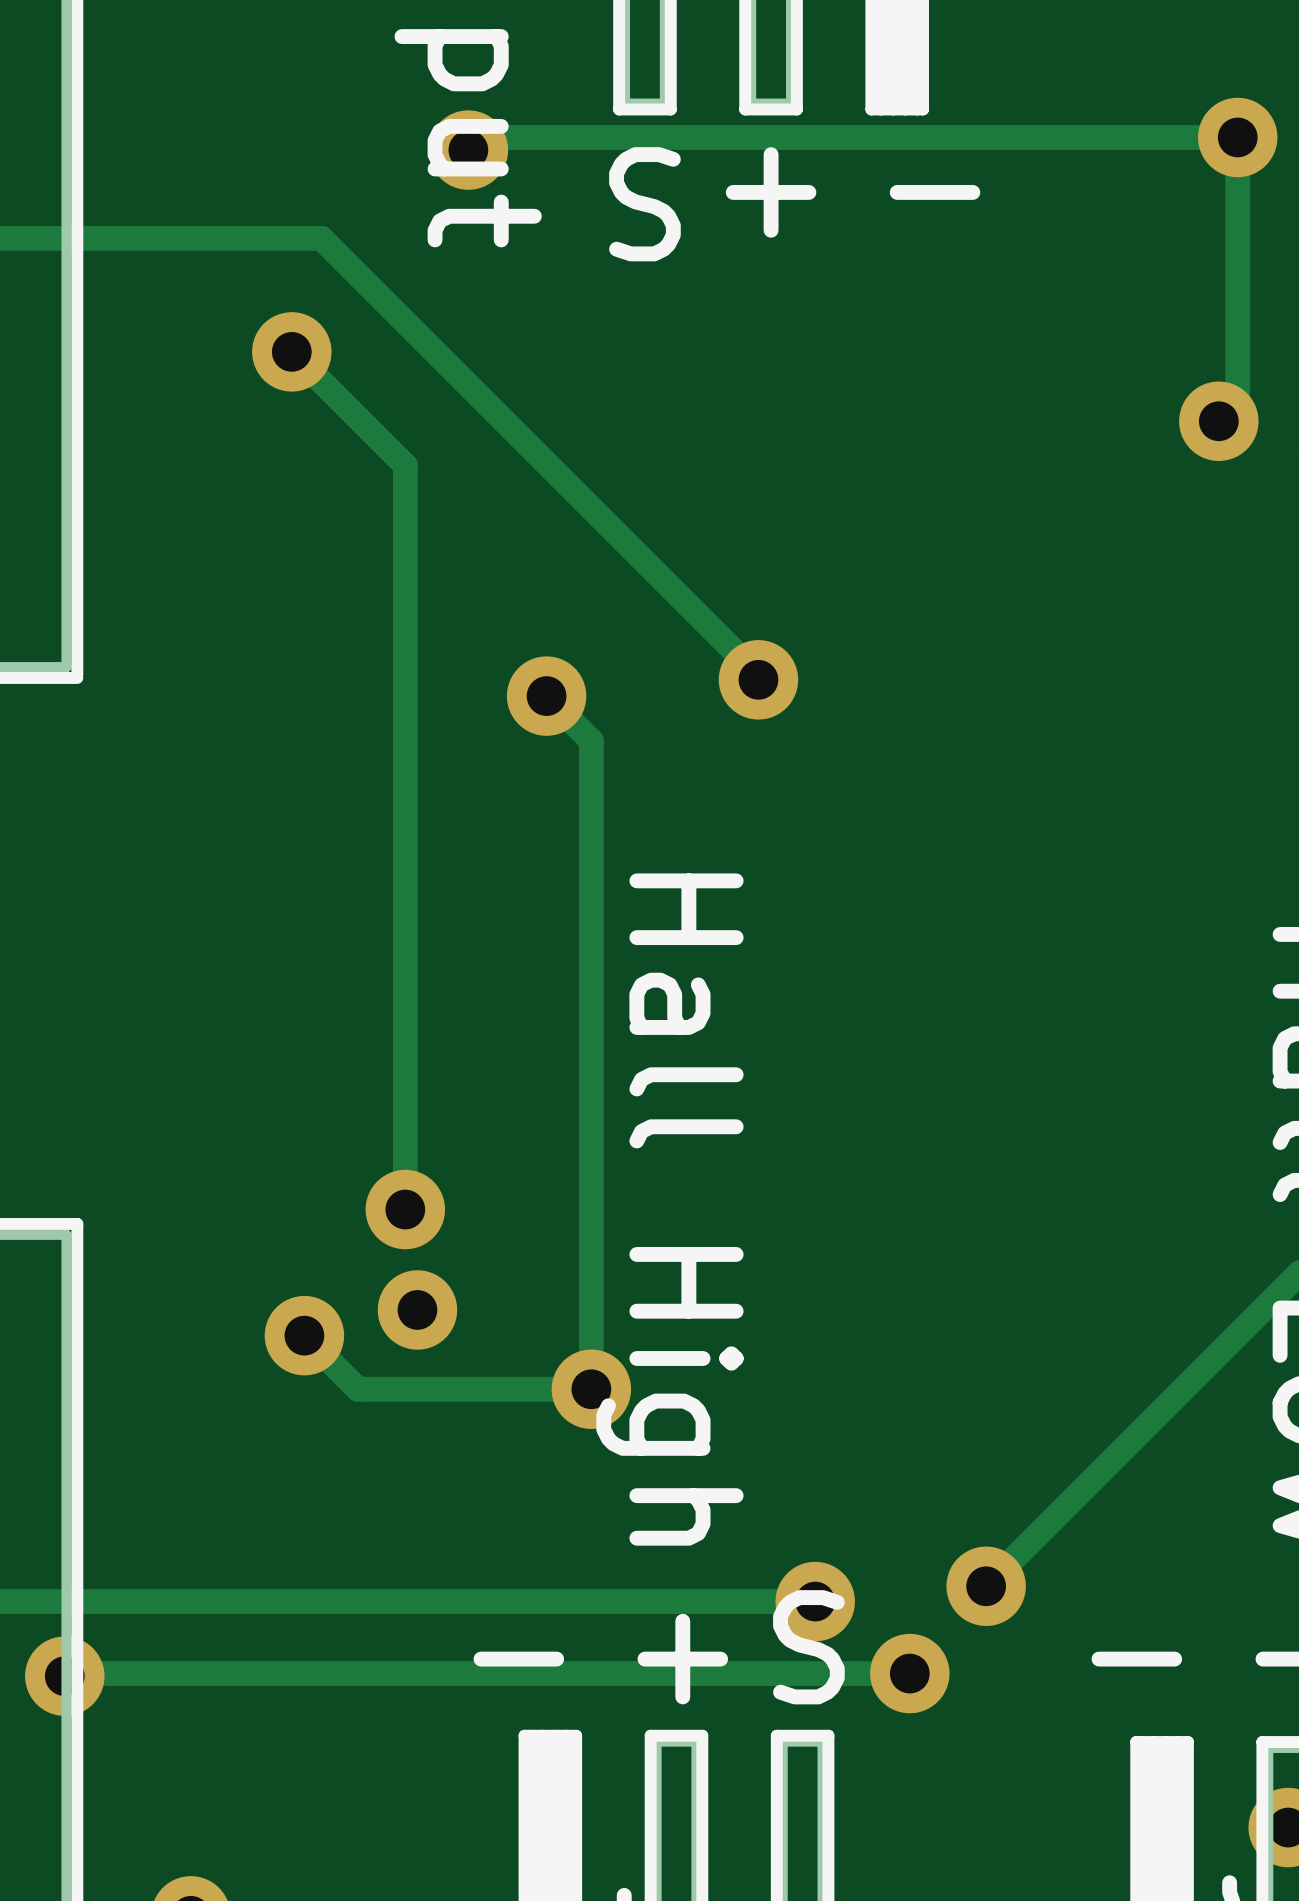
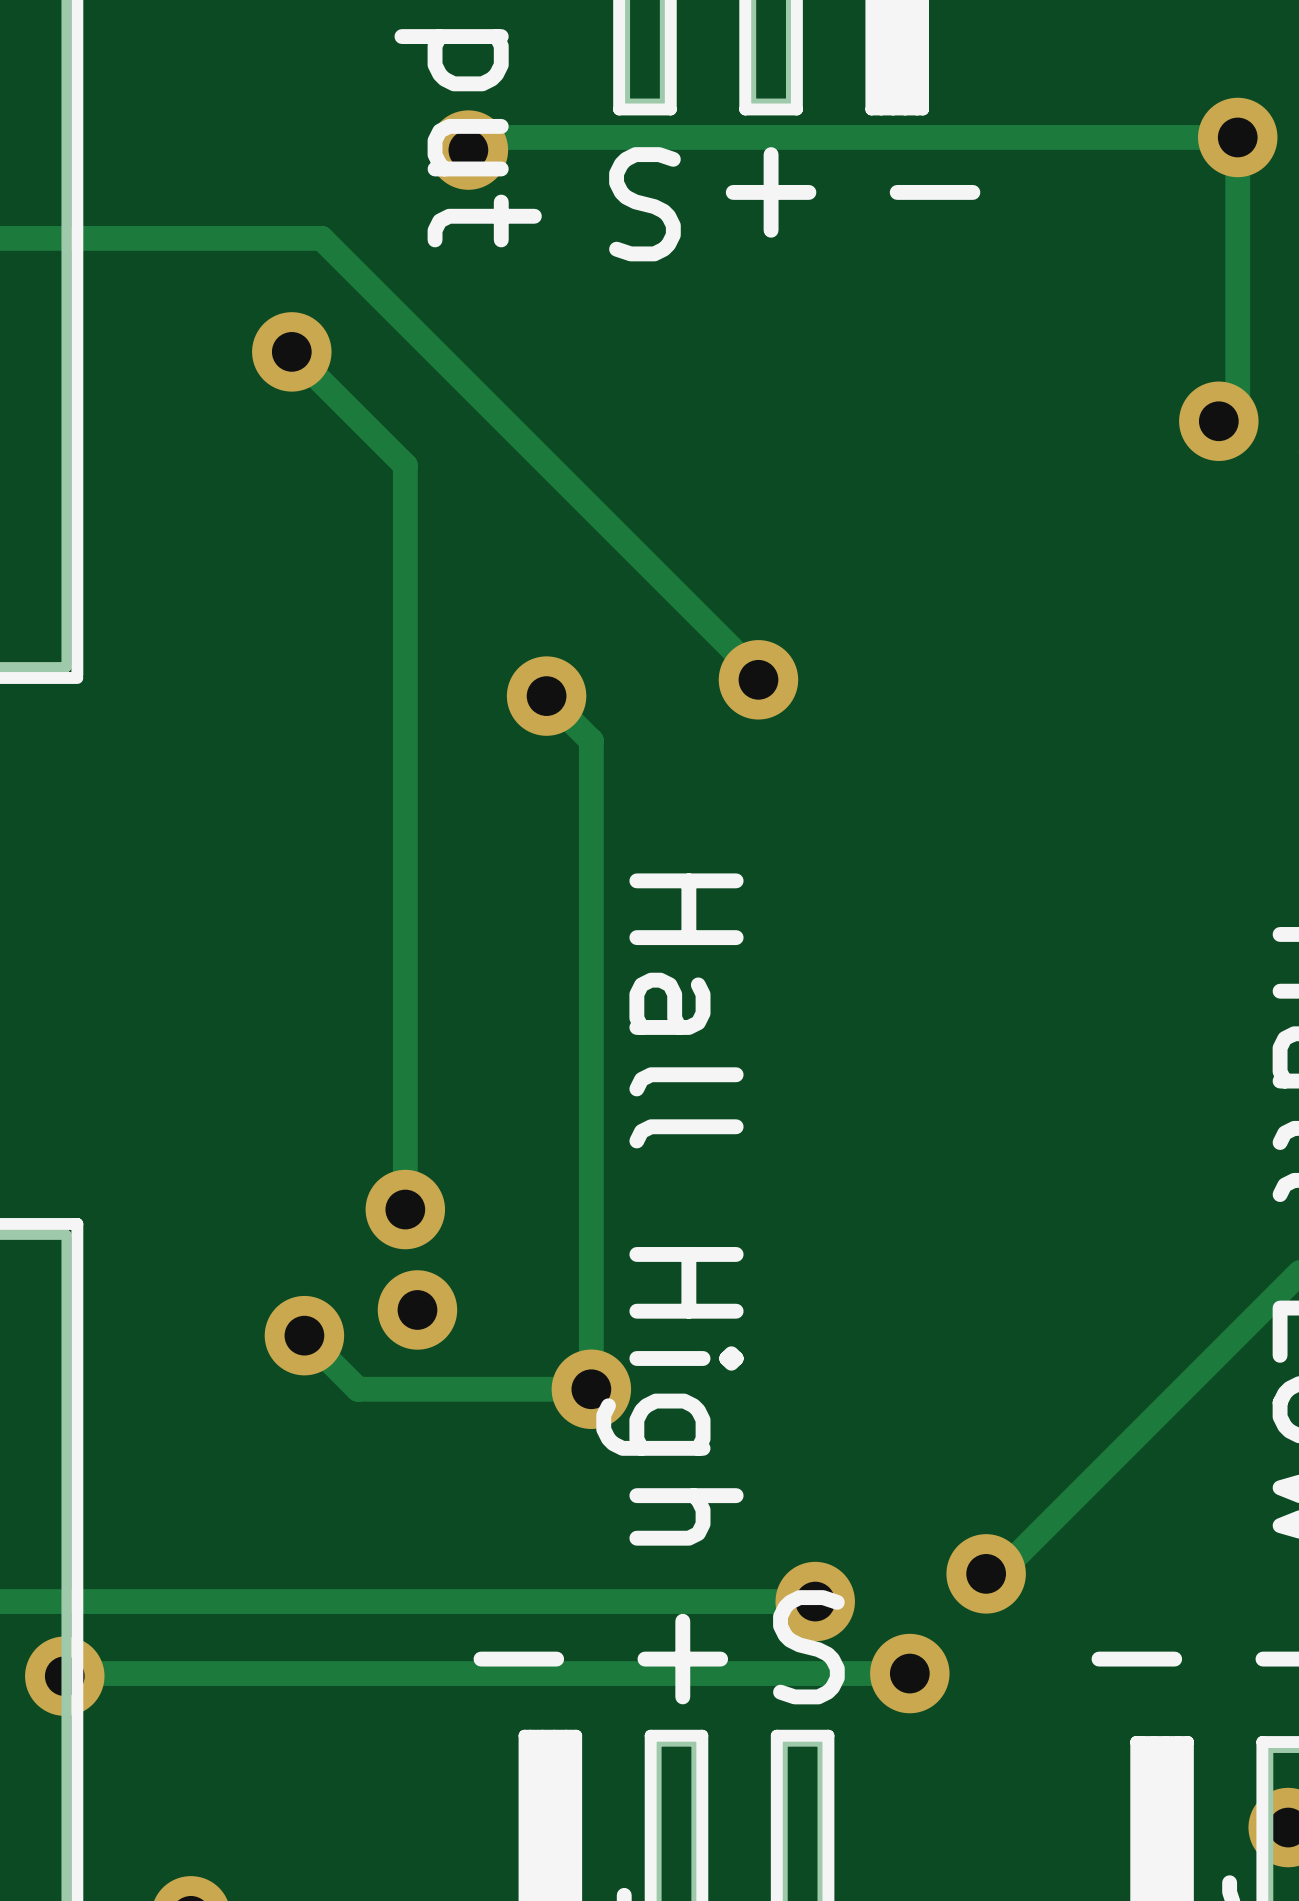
via position: (986, 1586) -> (986, 1573)

